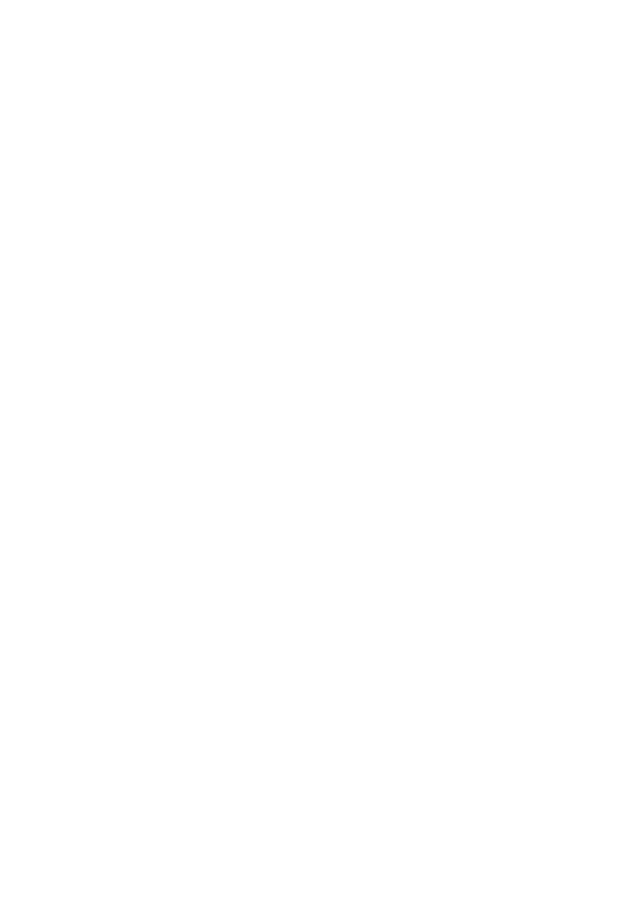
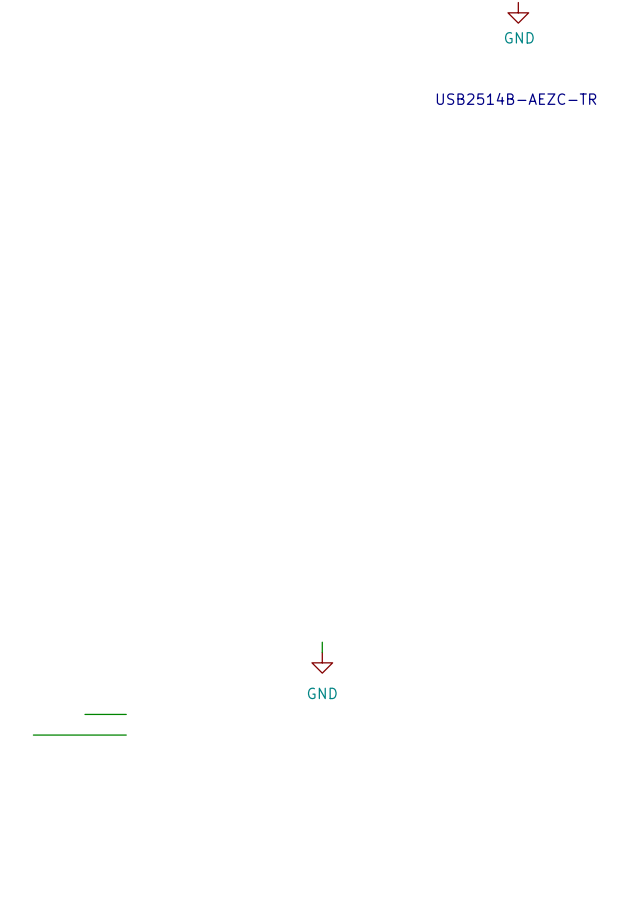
power symbol: none -> GND (518, 12)
text: none -> USB2514B-AEZC-TR (516, 98)
wire: none -> (322, 642) (322, 652)
power symbol: none -> GND (322, 662)
wire: none -> (84, 714) (126, 714)
wire: none -> (33, 735) (126, 735)

